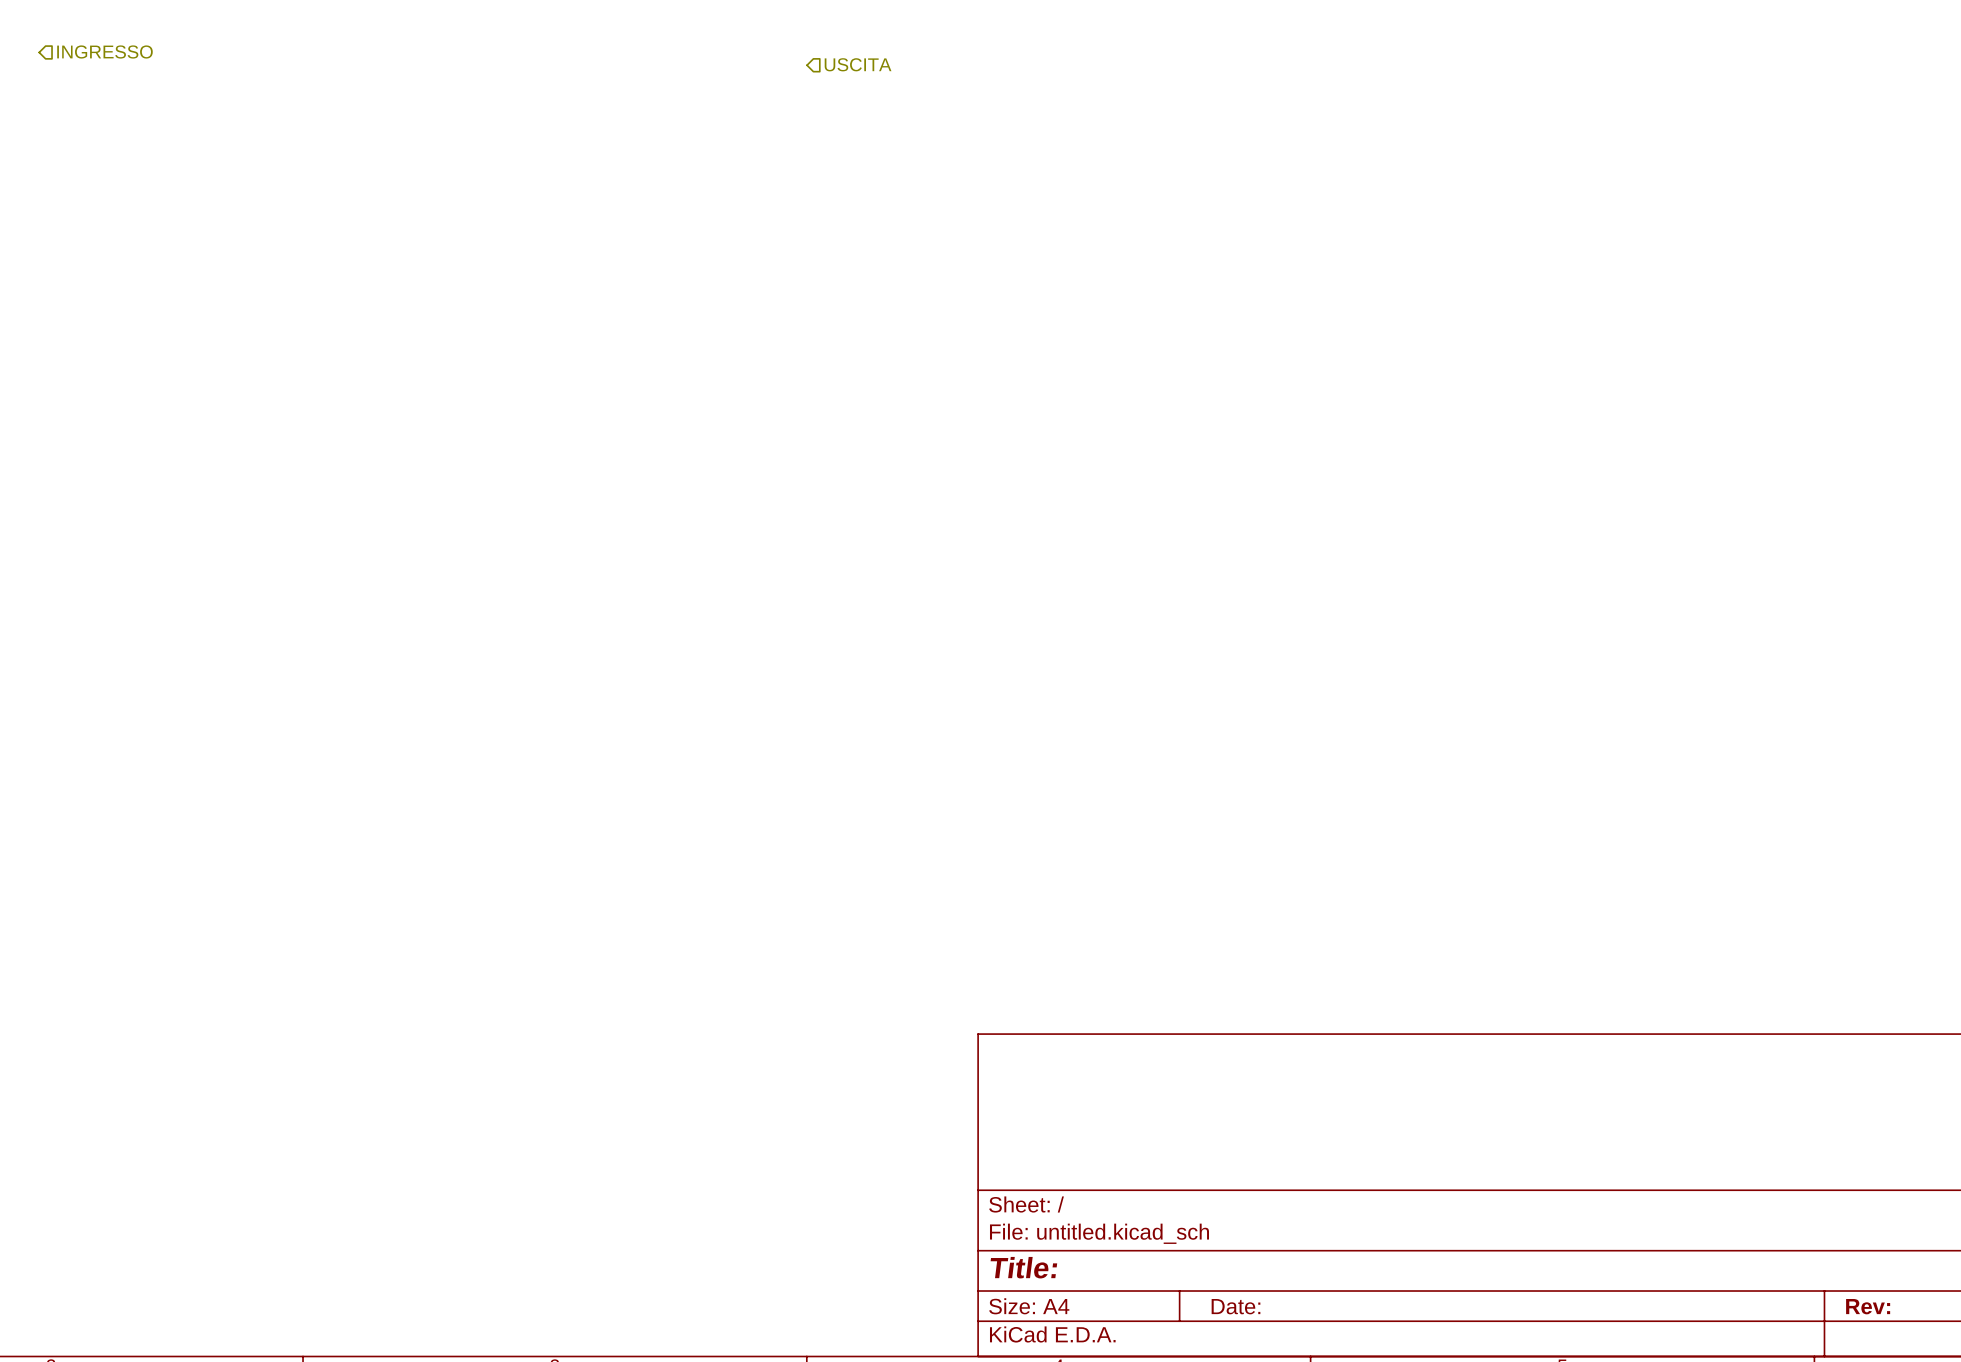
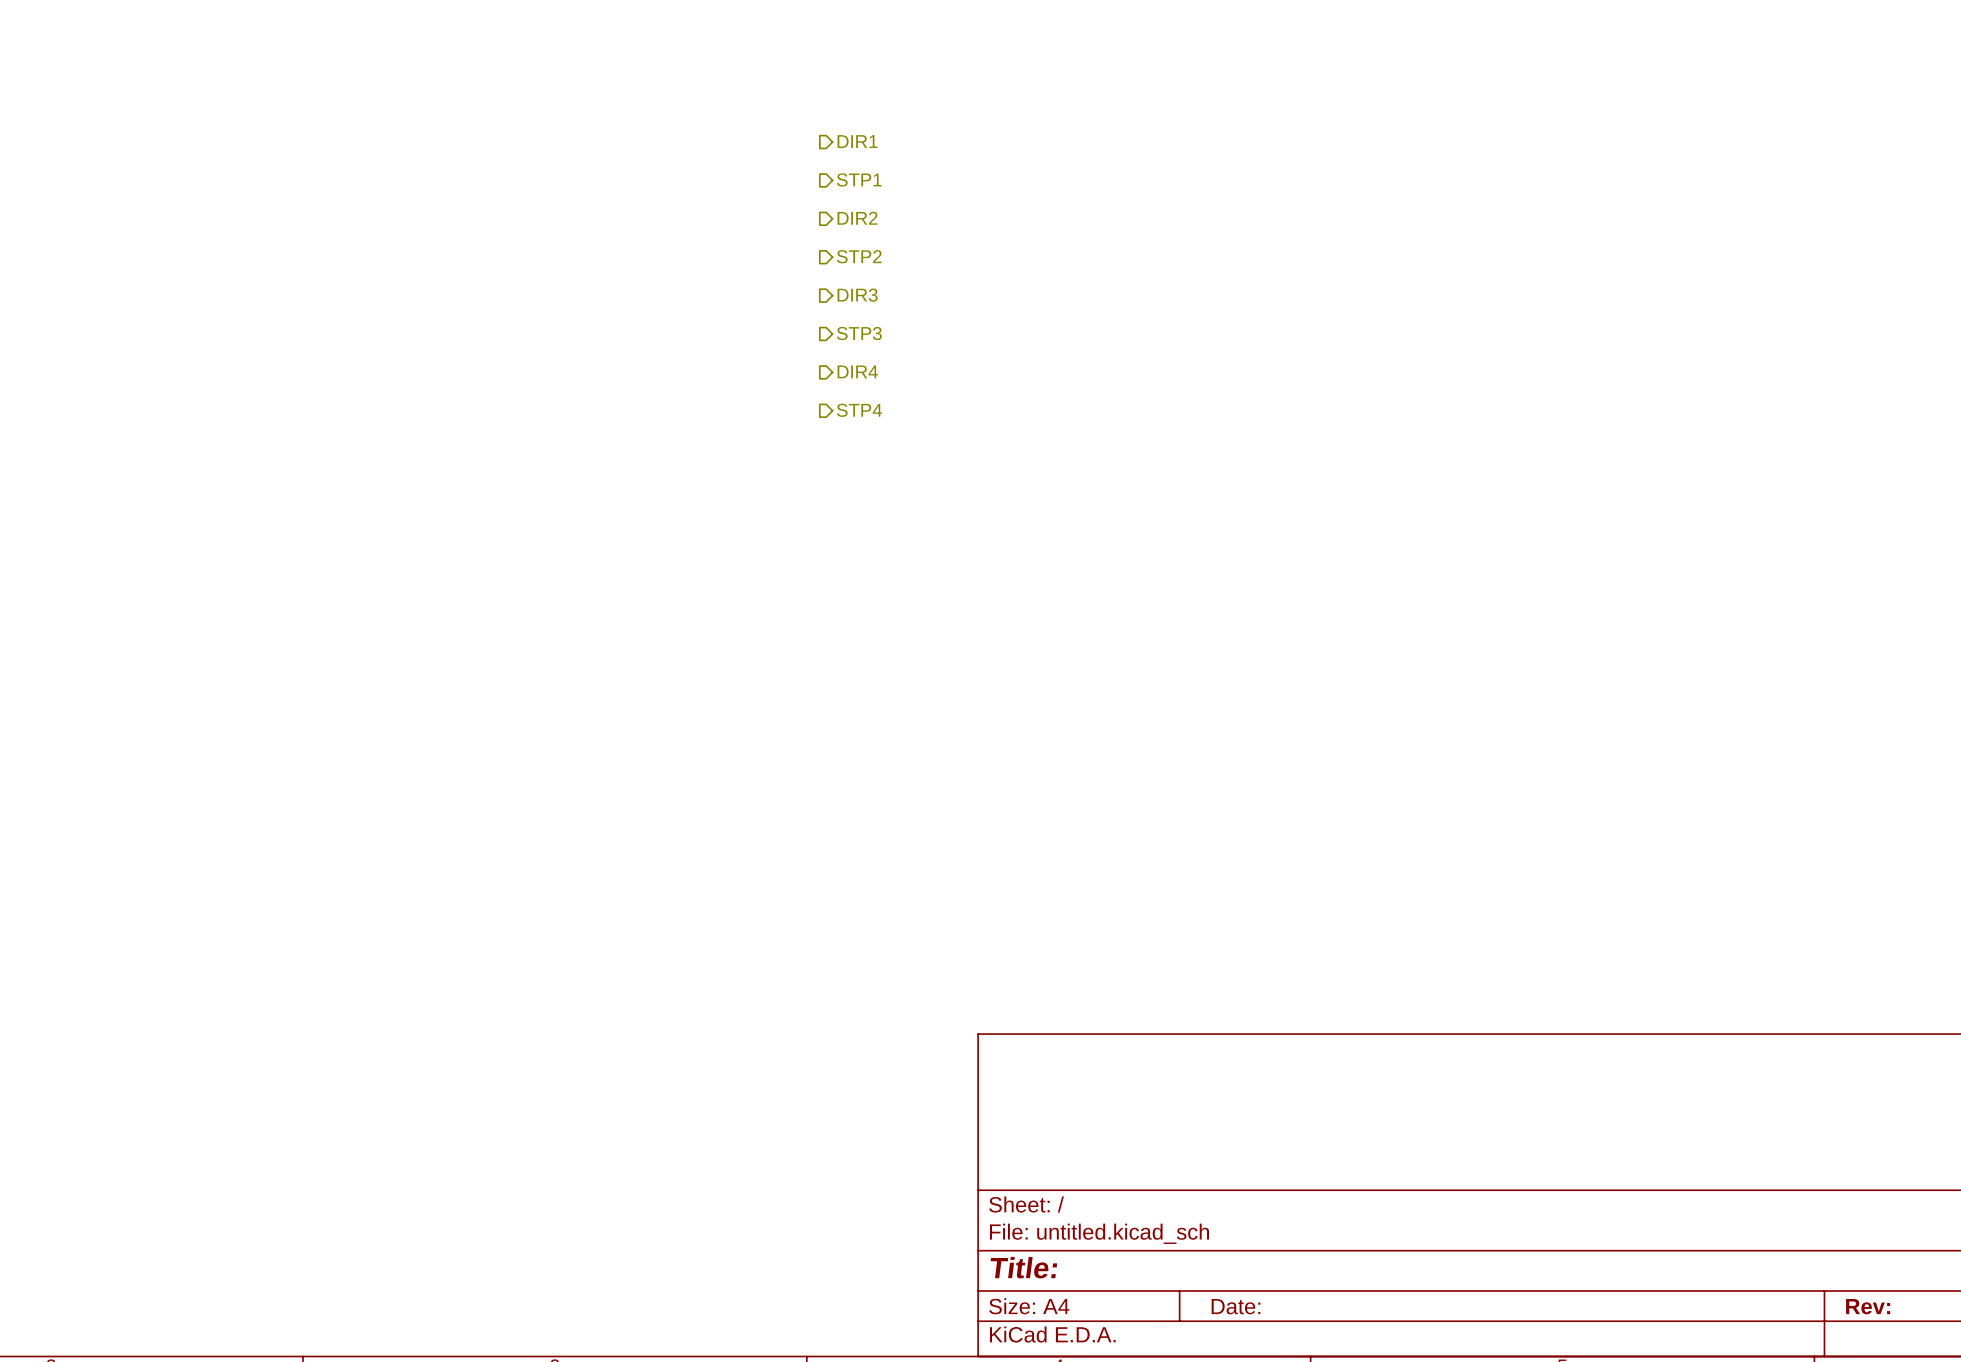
hierarchical label: INGRESSO (104, 51) -> none
hierarchical label: USCITA (858, 64) -> none
hierarchical label: none -> DIR1 (857, 141)
hierarchical label: none -> STP1 (859, 179)
hierarchical label: none -> DIR2 (857, 218)
hierarchical label: none -> STP2 (859, 256)
hierarchical label: none -> DIR3 (857, 295)
hierarchical label: none -> STP3 (859, 333)
hierarchical label: none -> DIR4 (857, 371)
hierarchical label: none -> STP4 (859, 410)

